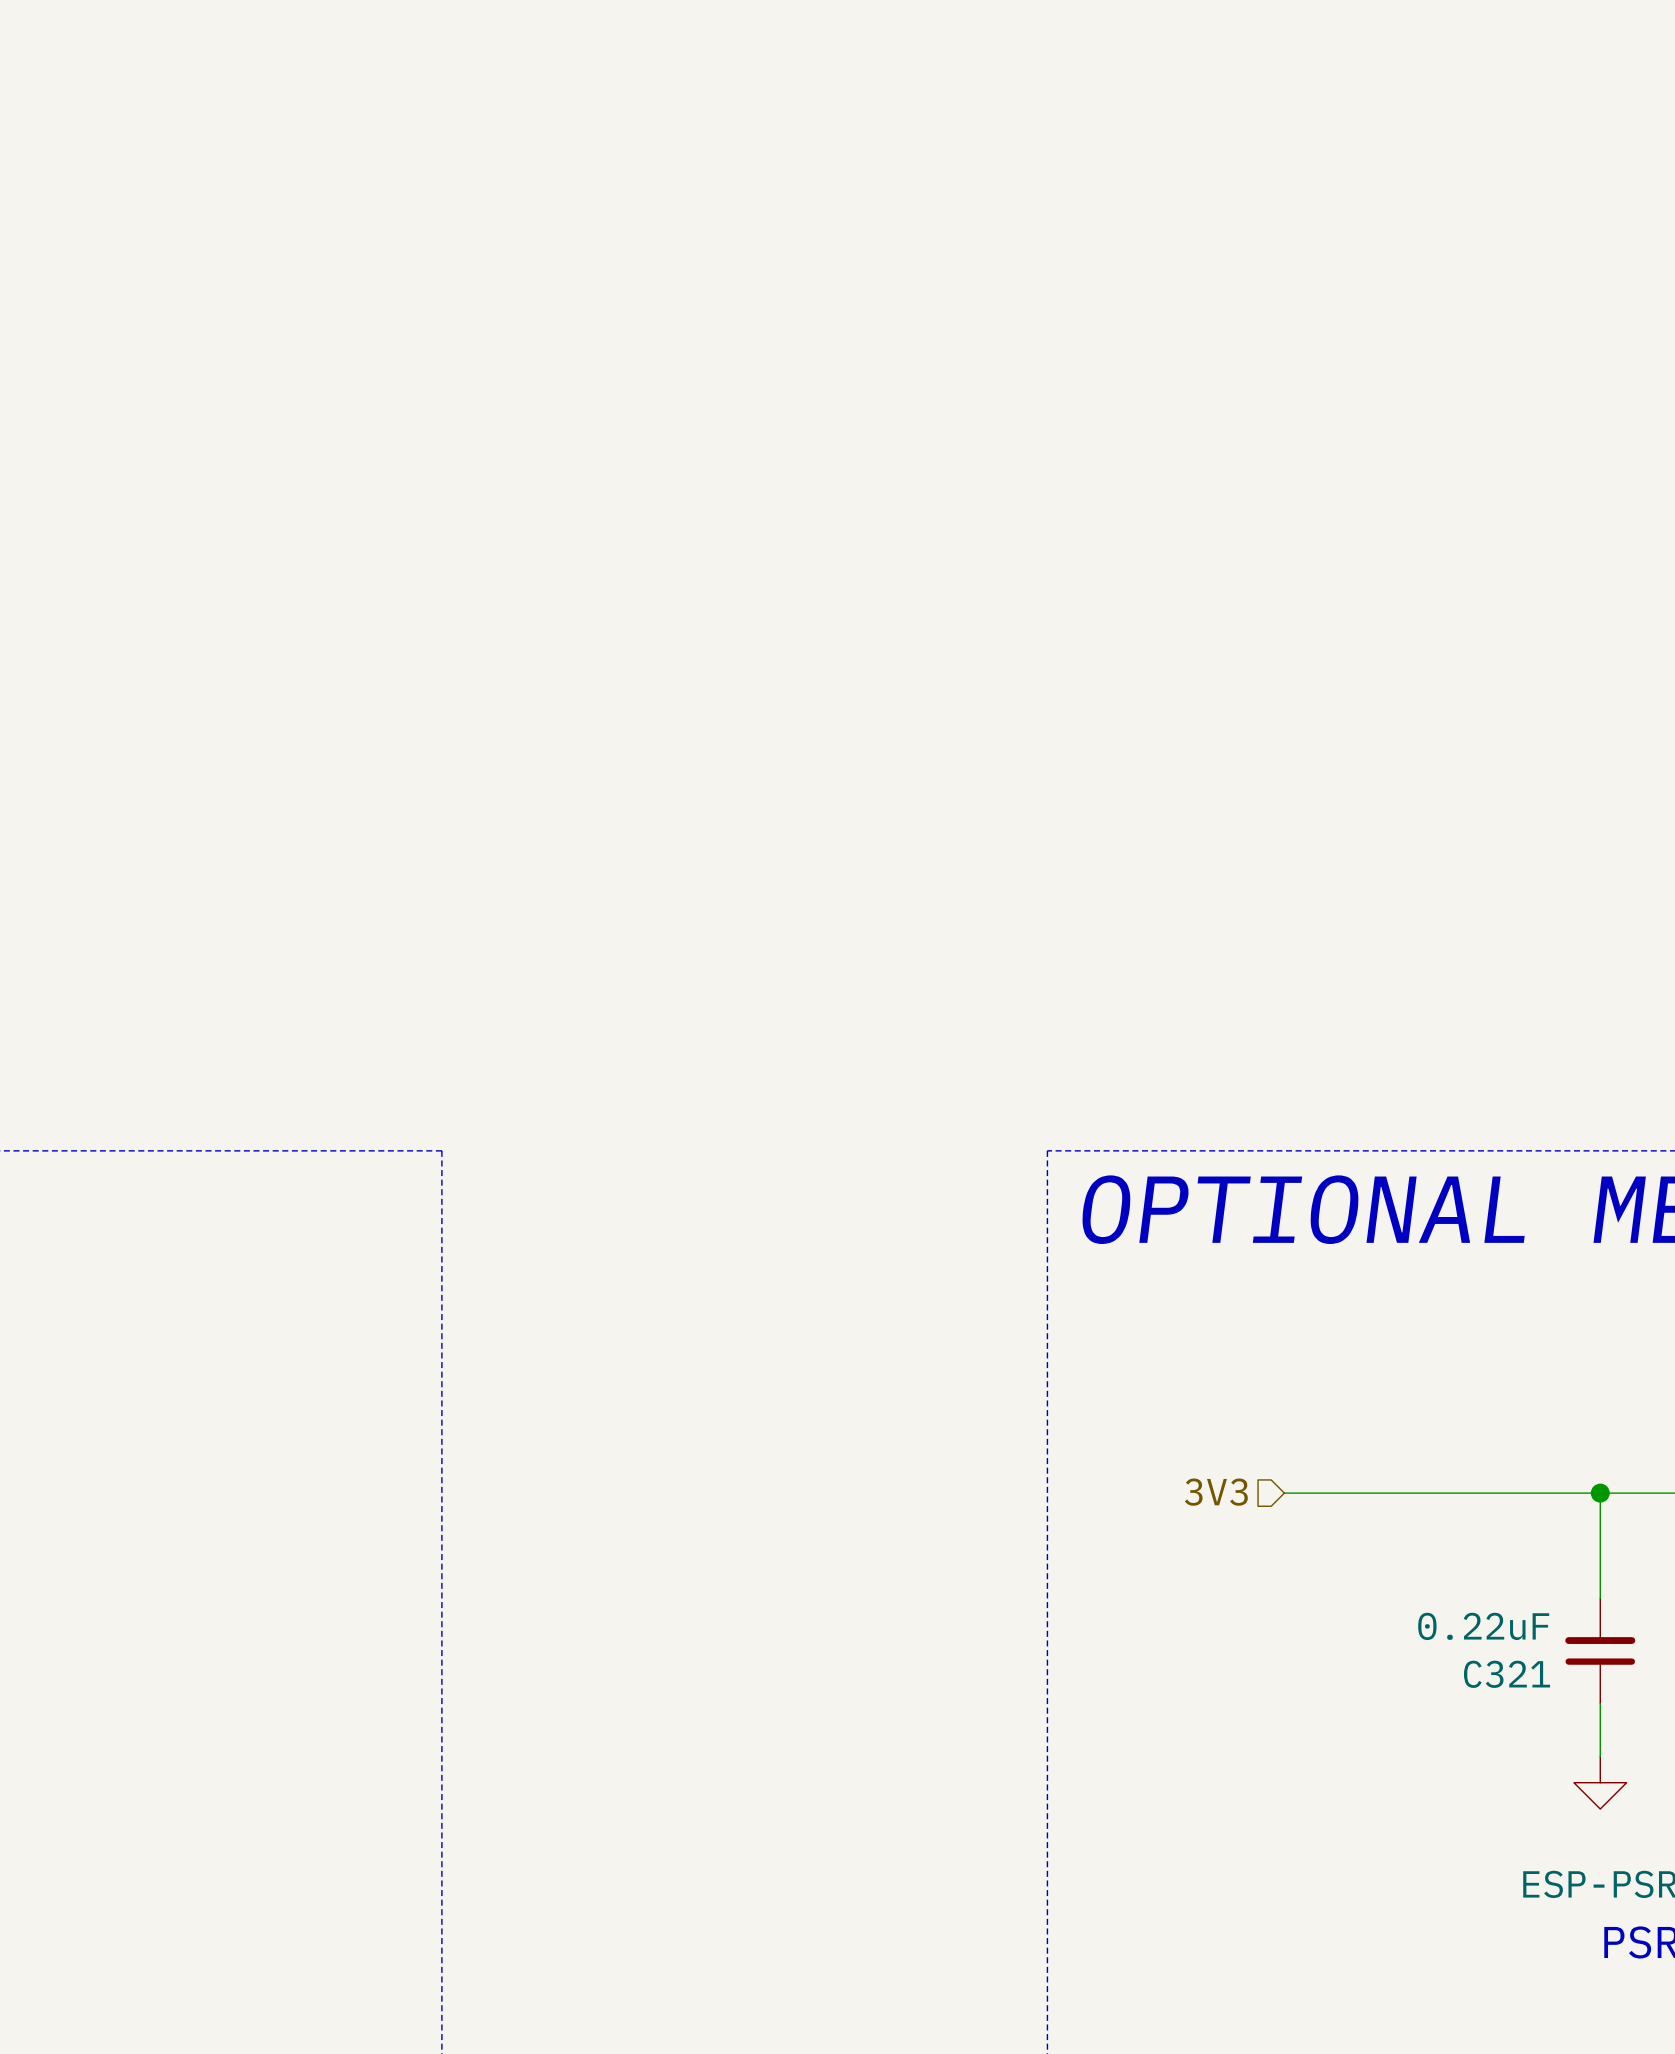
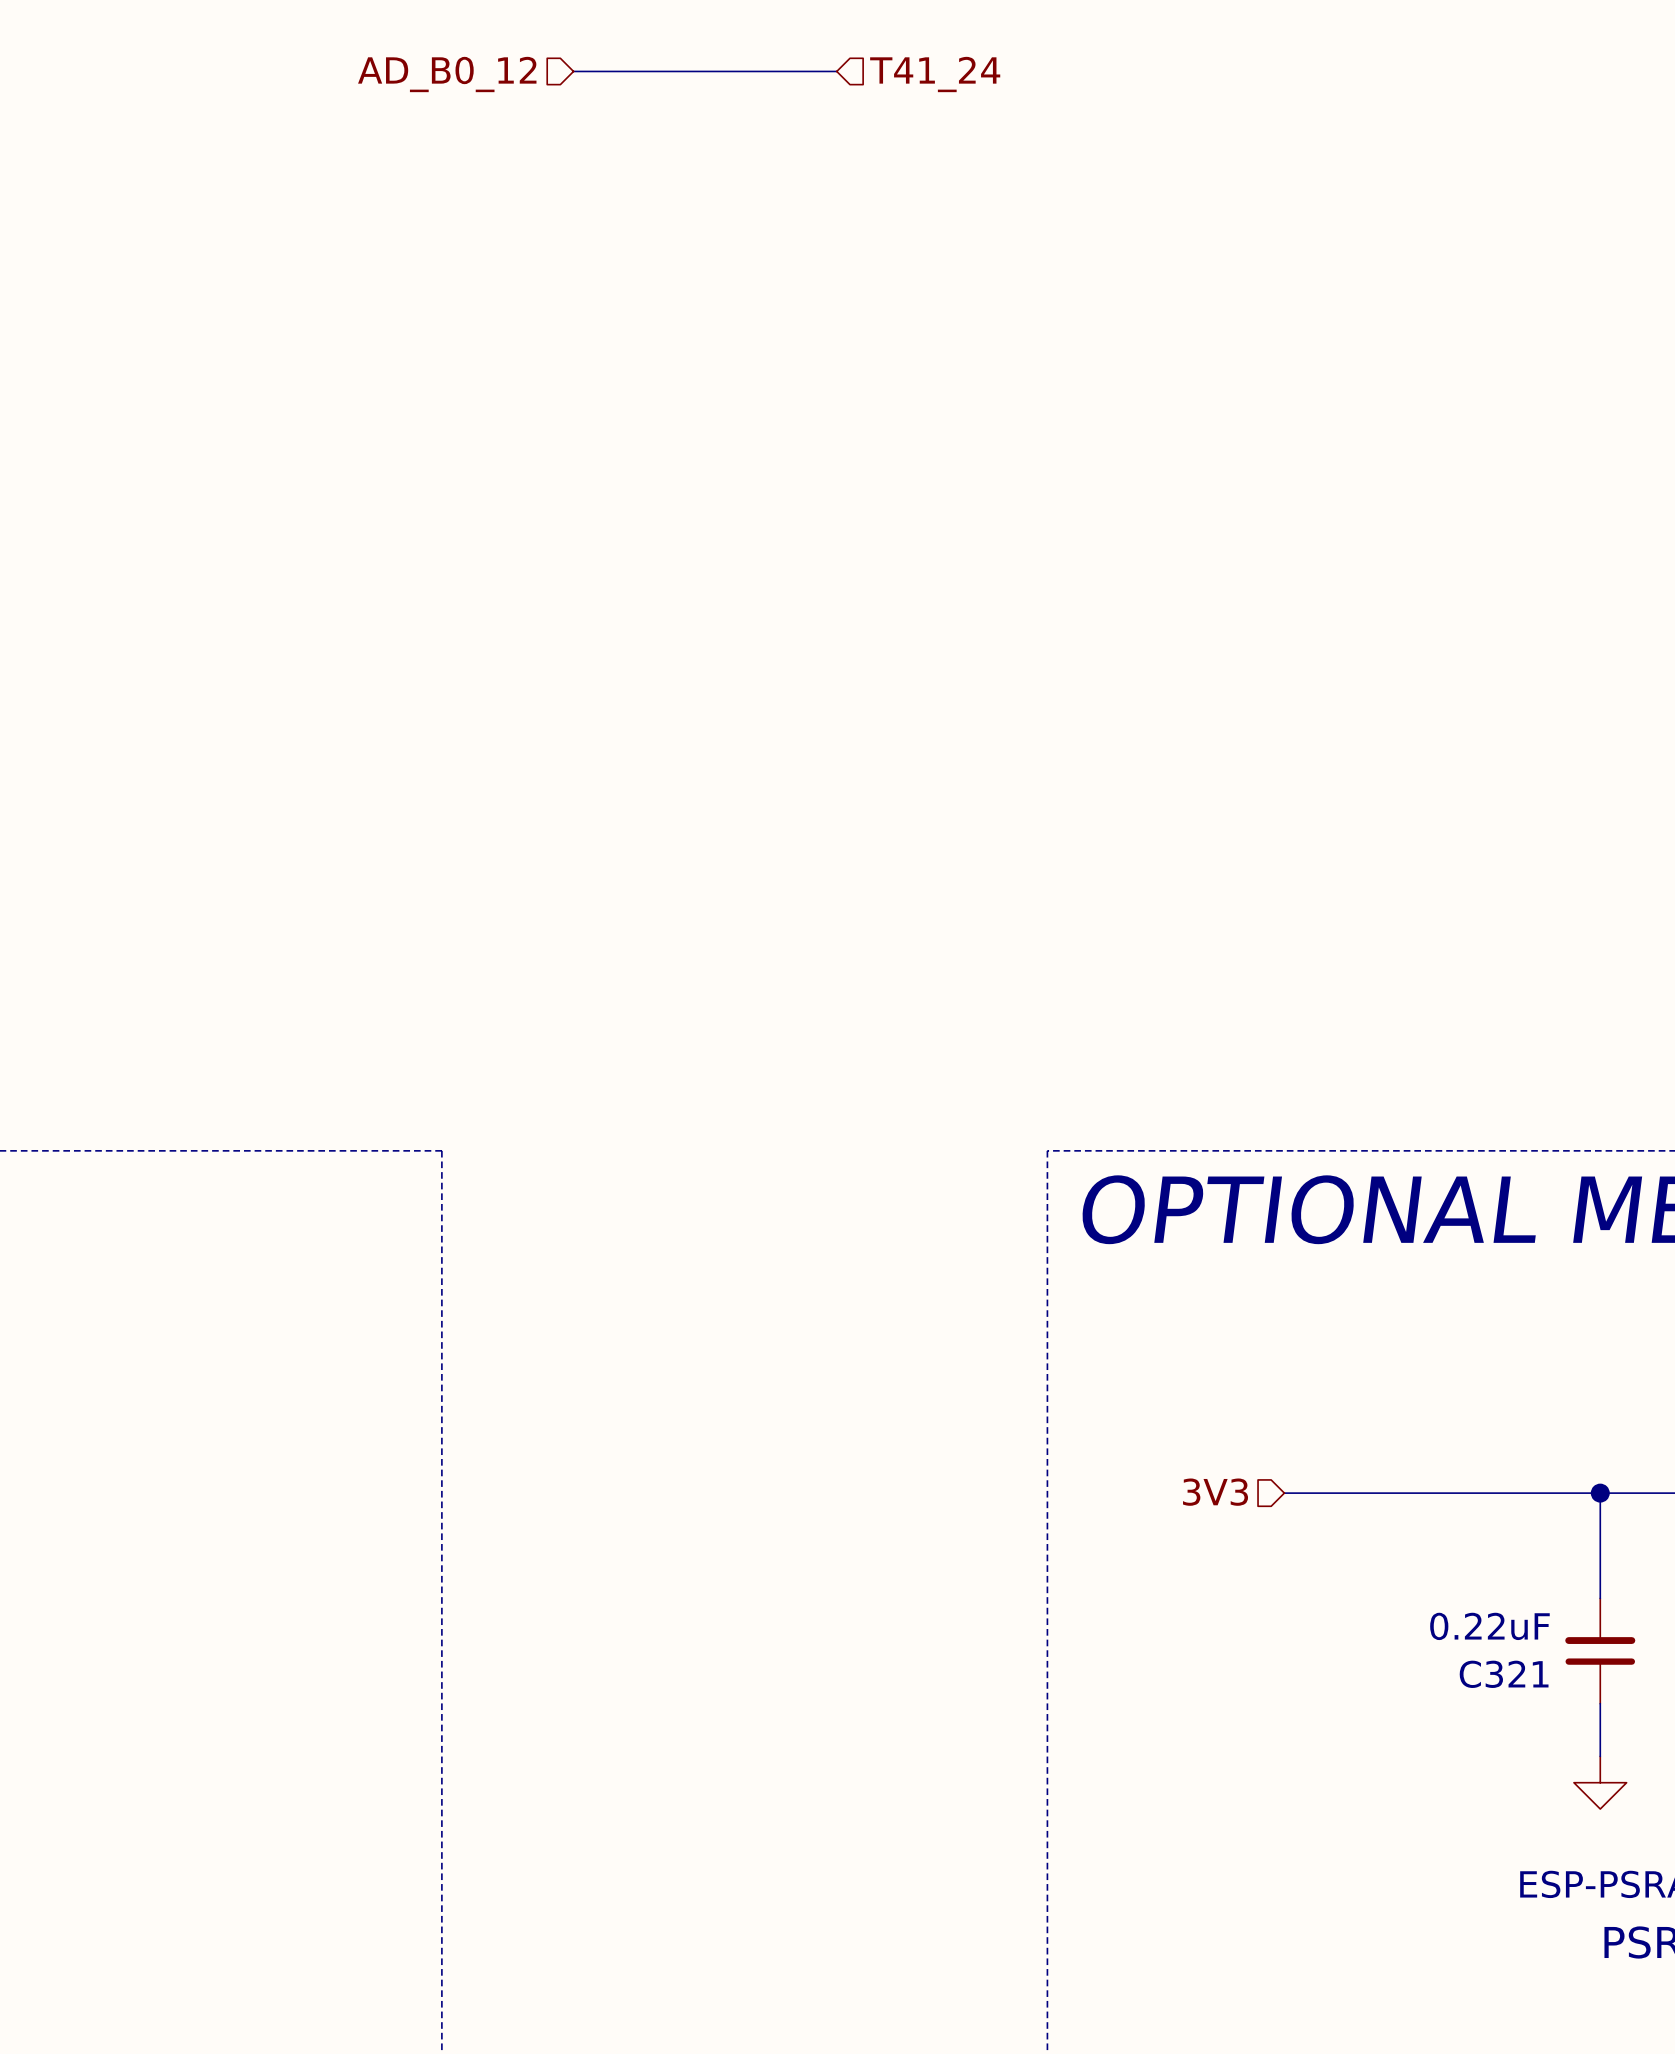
wire: none -> (573, 71) (836, 71)
hierarchical label: none -> AD_B0_12 (447, 74)
hierarchical label: none -> T41_24 (935, 74)

